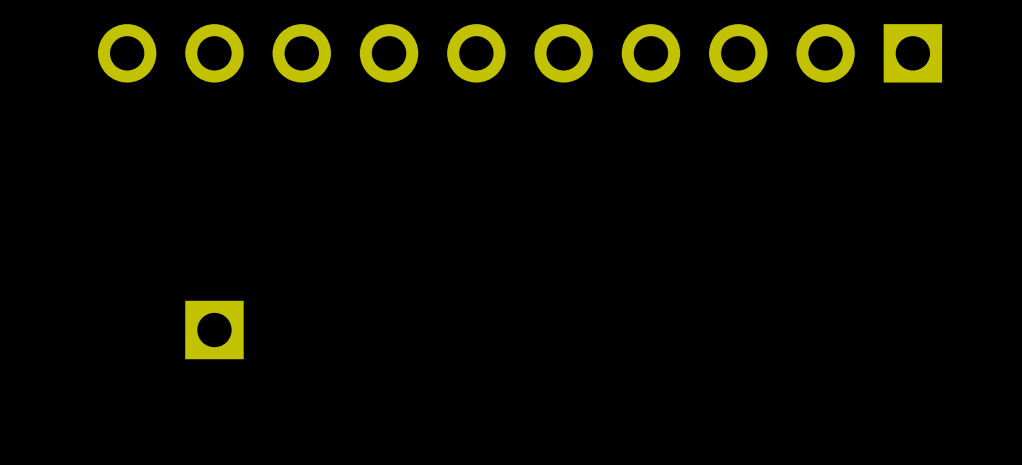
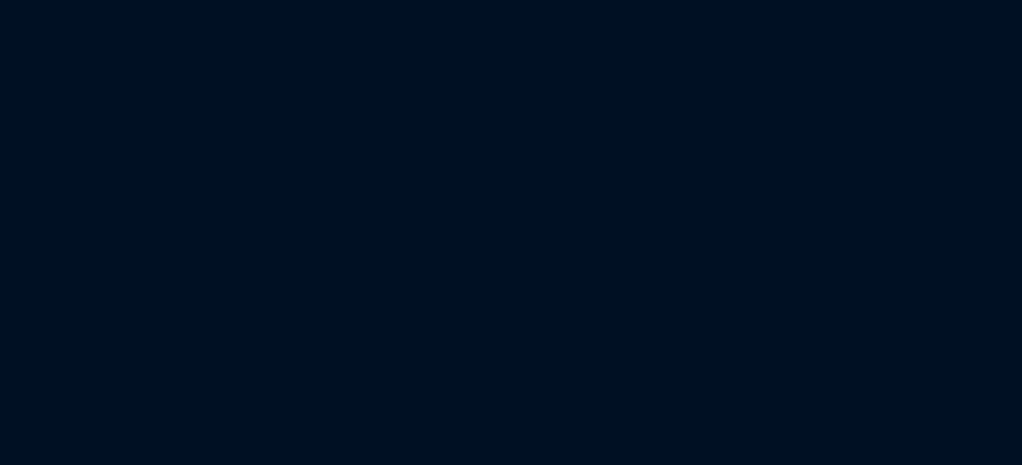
part: (520, 53) -> none
part: (214, 330) -> none

